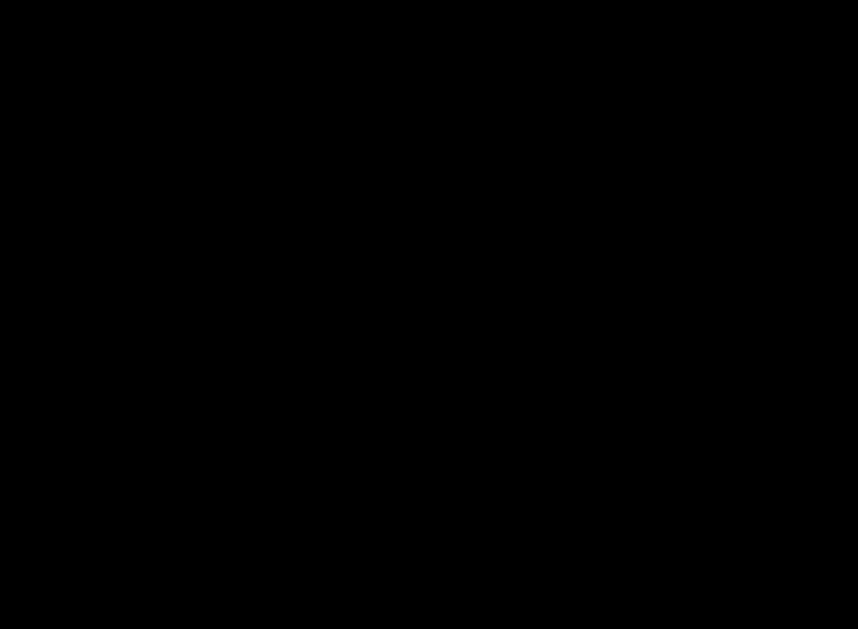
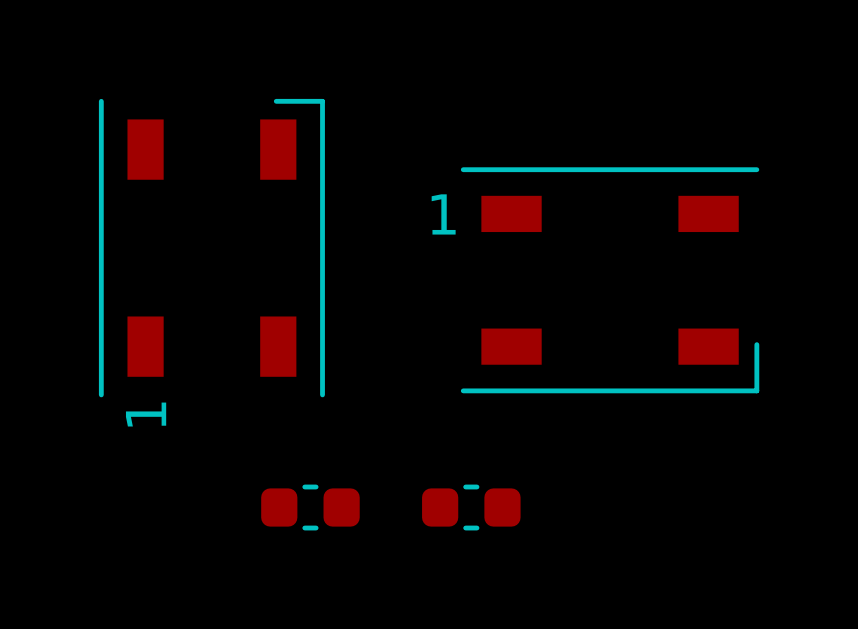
part: none -> (211, 248)
part: none -> (610, 280)
part: none -> (310, 507)
part: none -> (471, 507)

